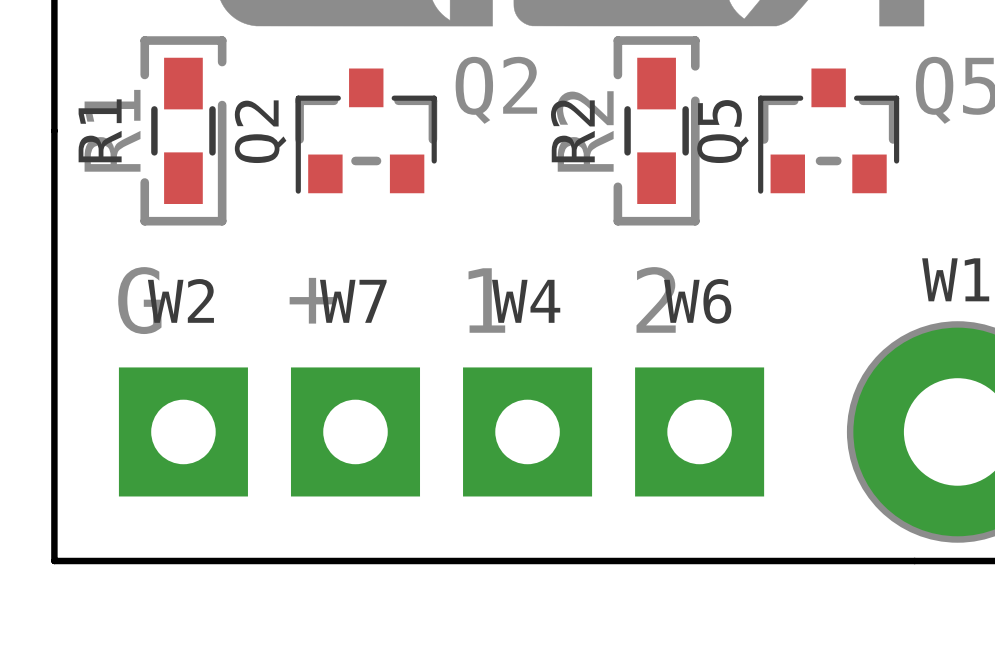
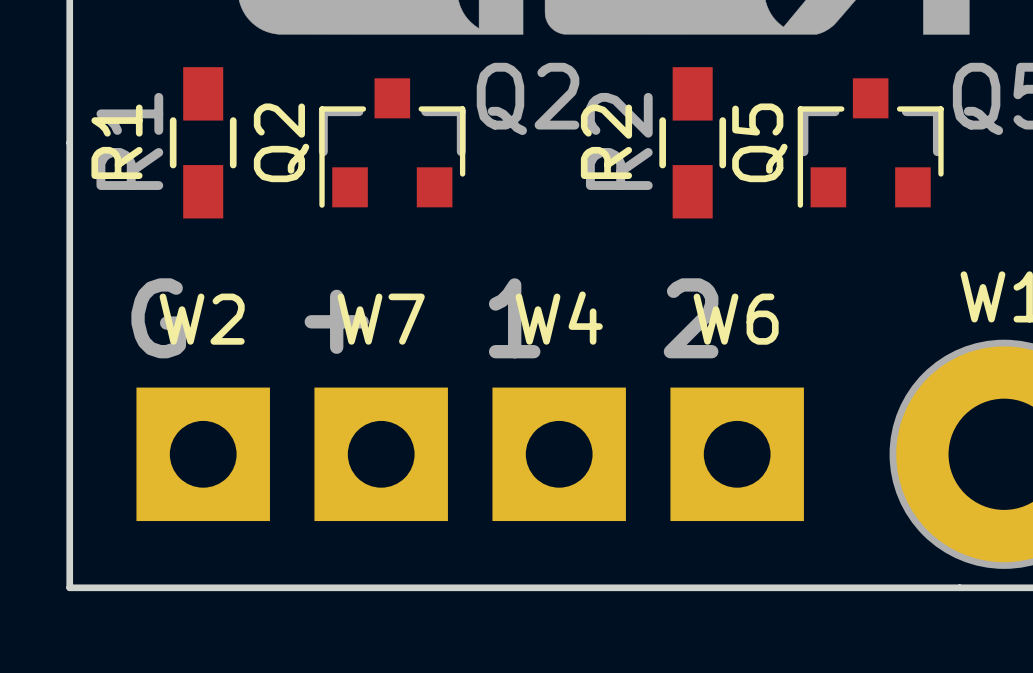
line: (222, 62) (222, 40) (144, 40) (144, 74) -> none
line: (695, 66) (695, 40) (617, 40) (617, 74) -> none
line: (695, 100) (695, 221) (617, 221) (617, 186) -> none
line: (222, 105) (222, 221) (144, 221) (144, 182) -> none
line: (355, 160) (377, 160) -> none
line: (820, 160) (837, 160) -> none

